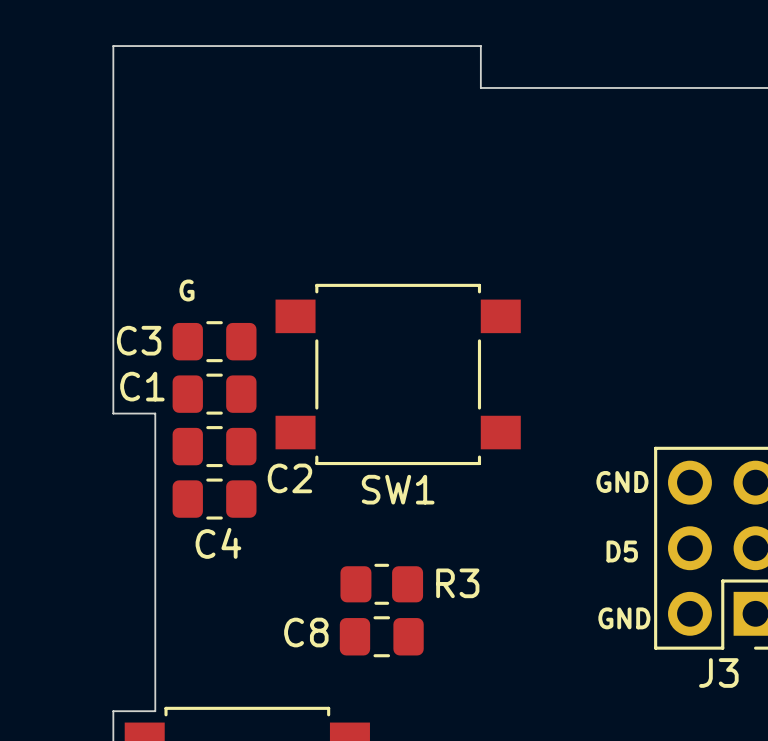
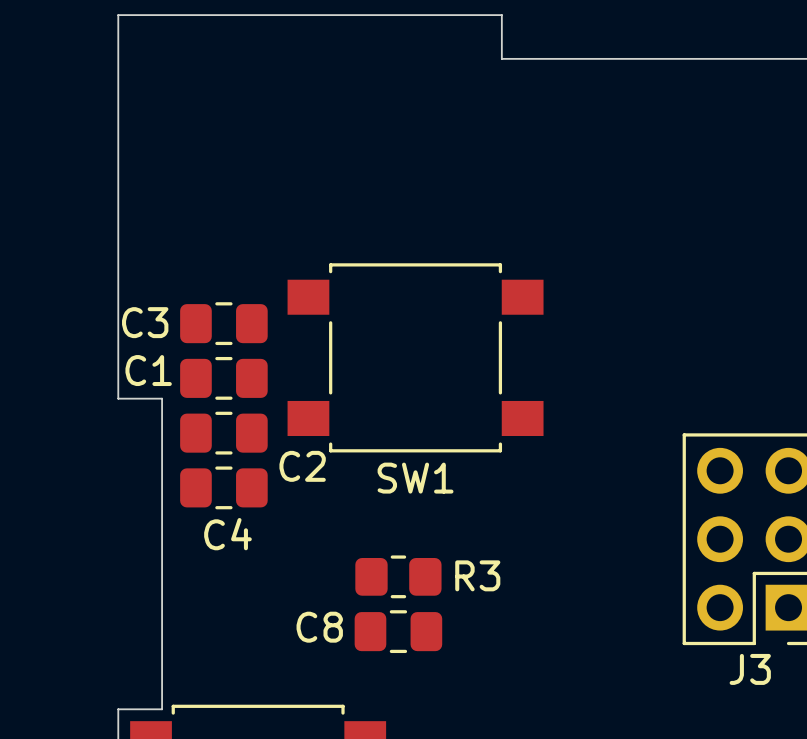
text: G (187, 290) -> none
text: GND (622, 481) -> none
text: D5 (622, 551) -> none
text: GND (624, 618) -> none

